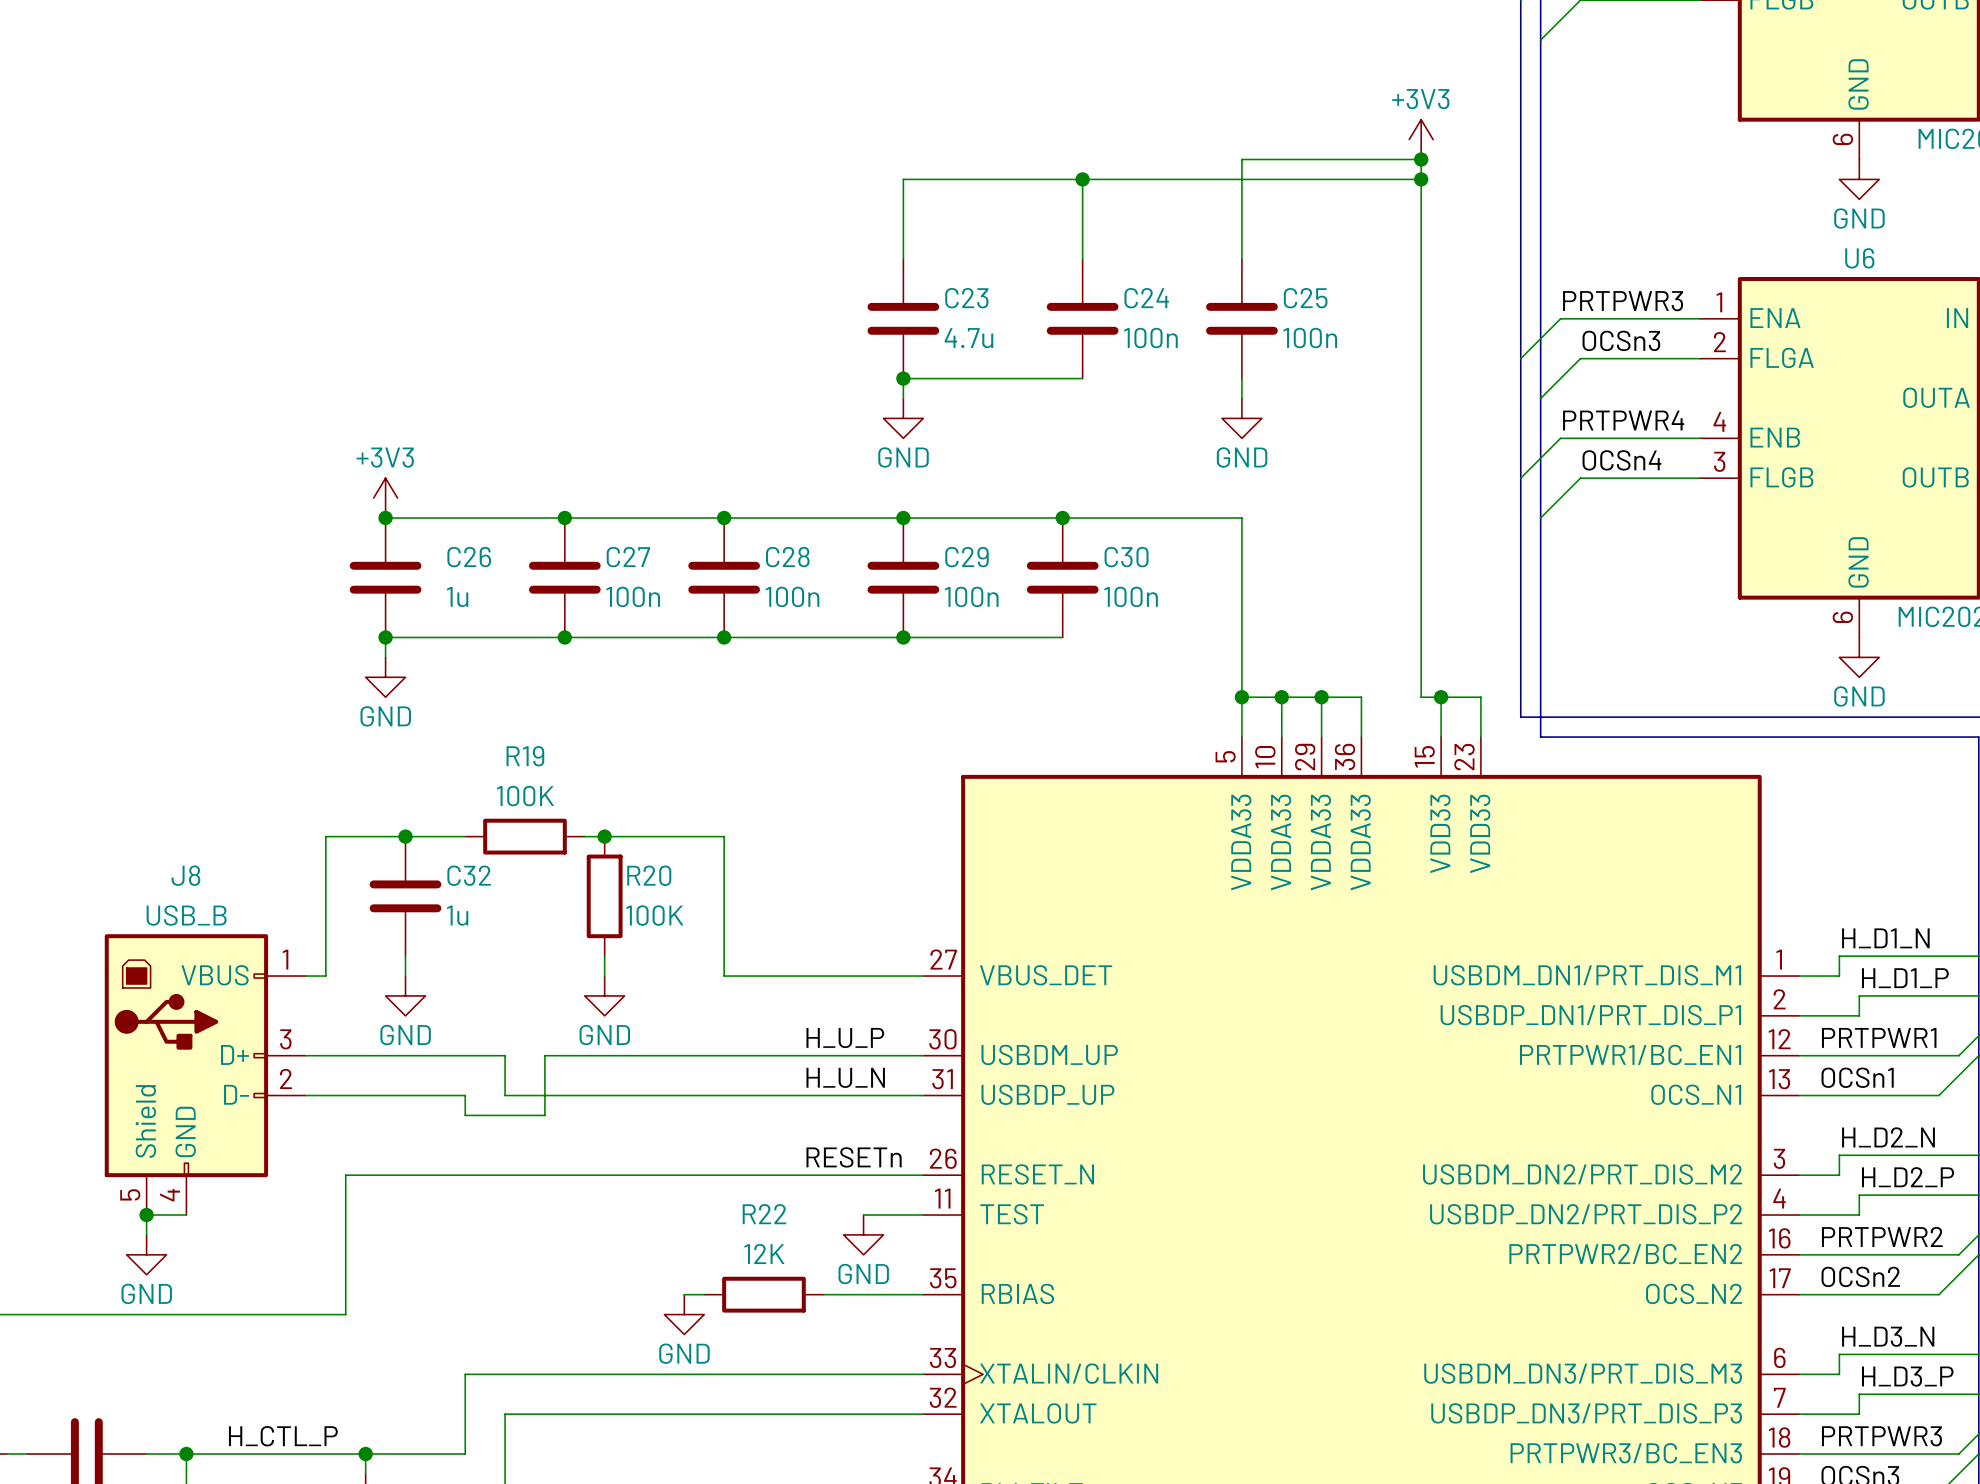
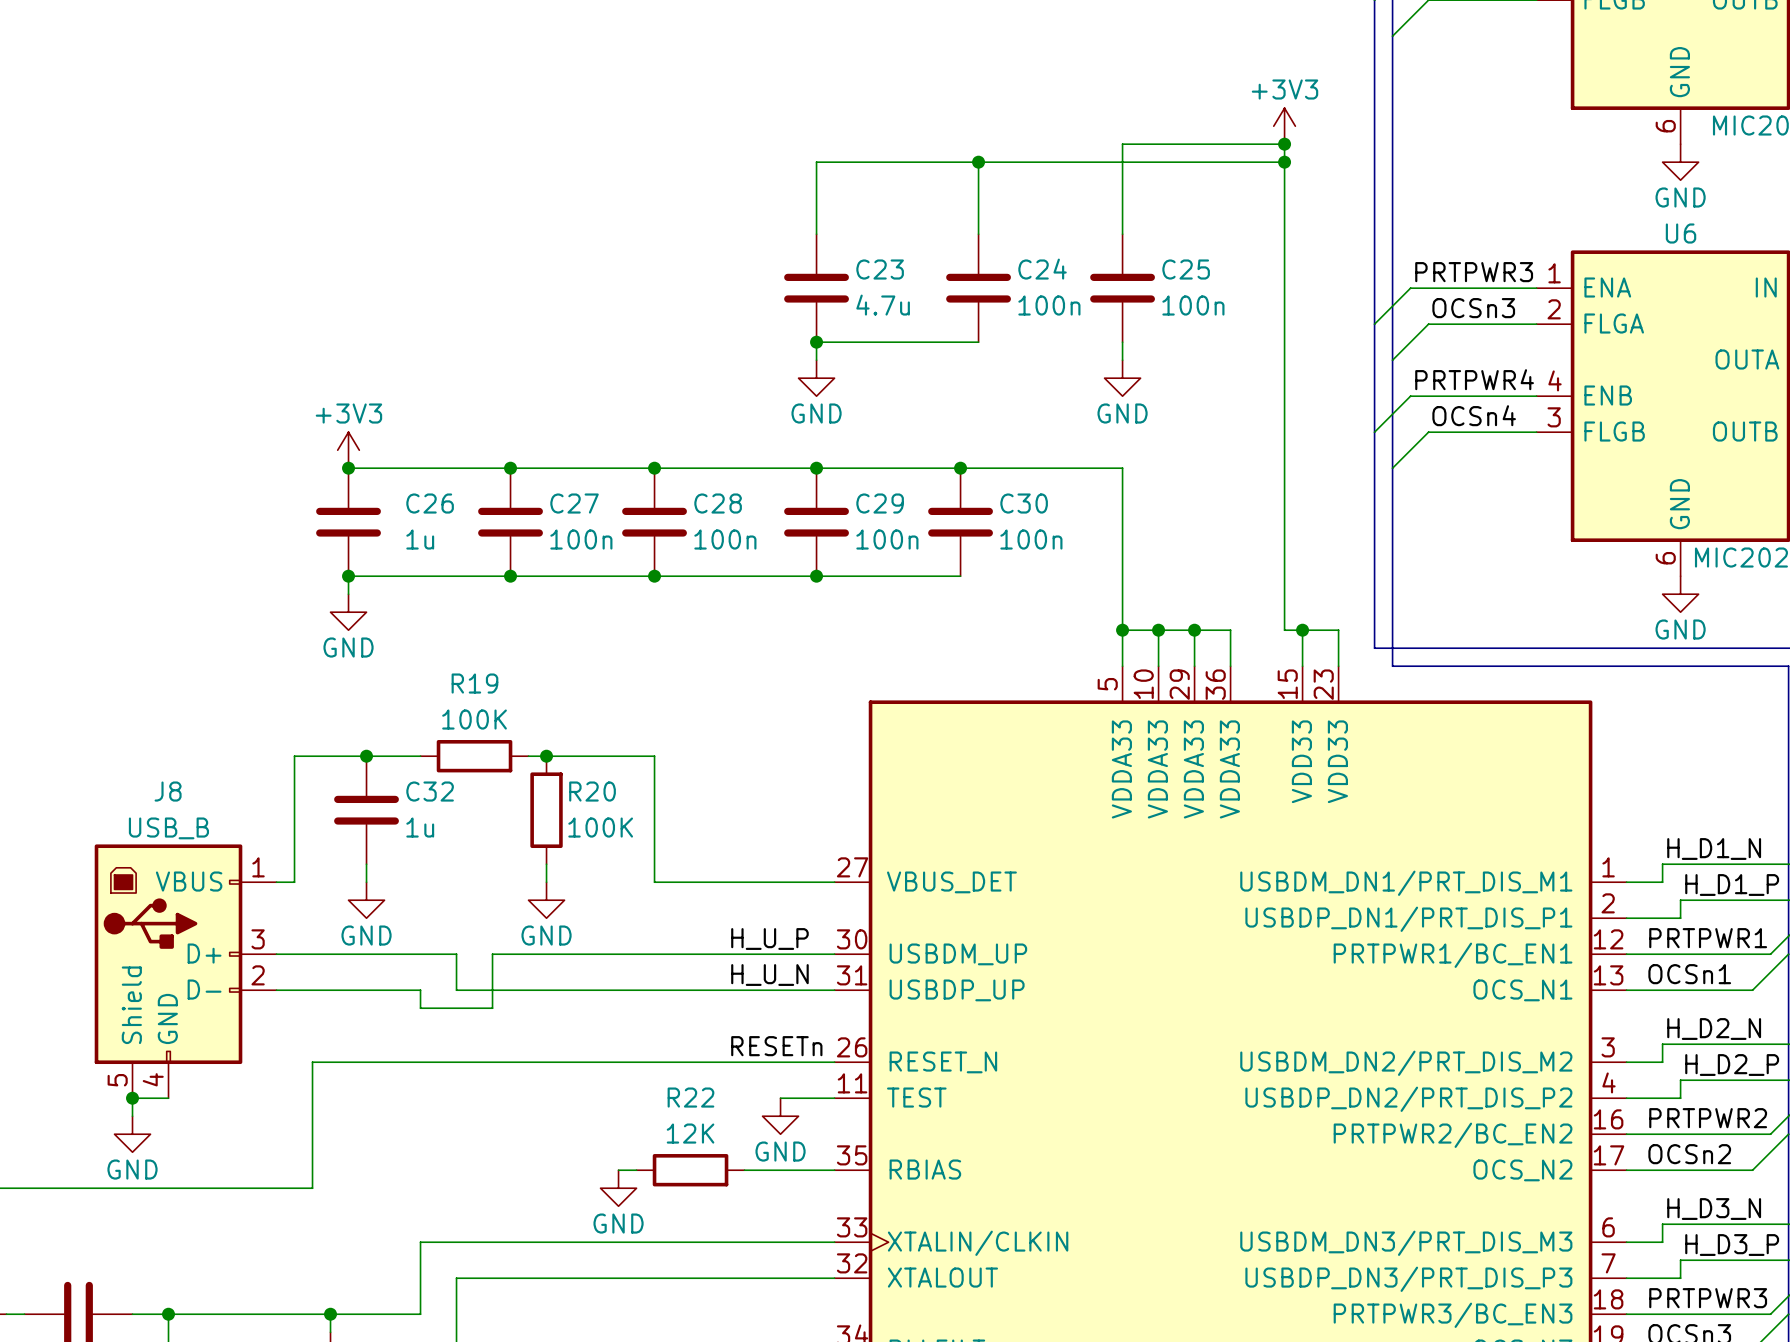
label: H_CTL_P (283, 1436) -> none

